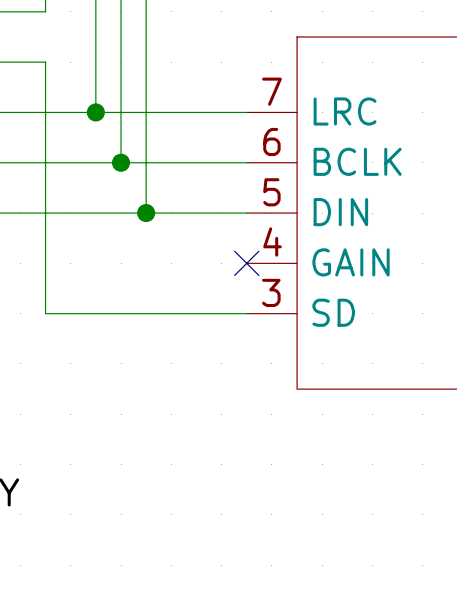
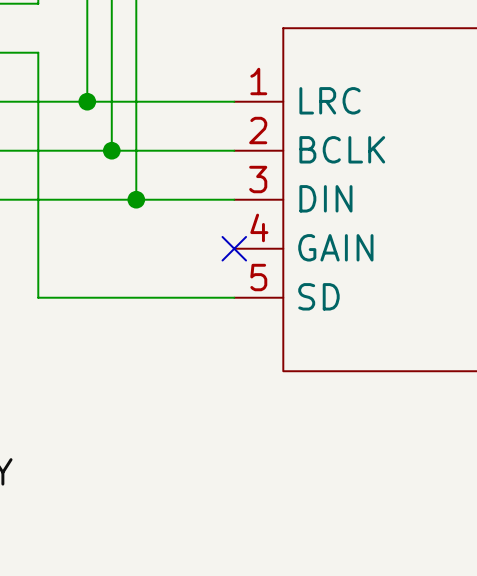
part pin number: 7 (271, 91) -> 1 (258, 81)
part pin number: 6 (271, 142) -> 2 (258, 130)
part pin number: 5 (271, 192) -> 3 (258, 179)
part pin number: 3 (271, 292) -> 5 (258, 277)

